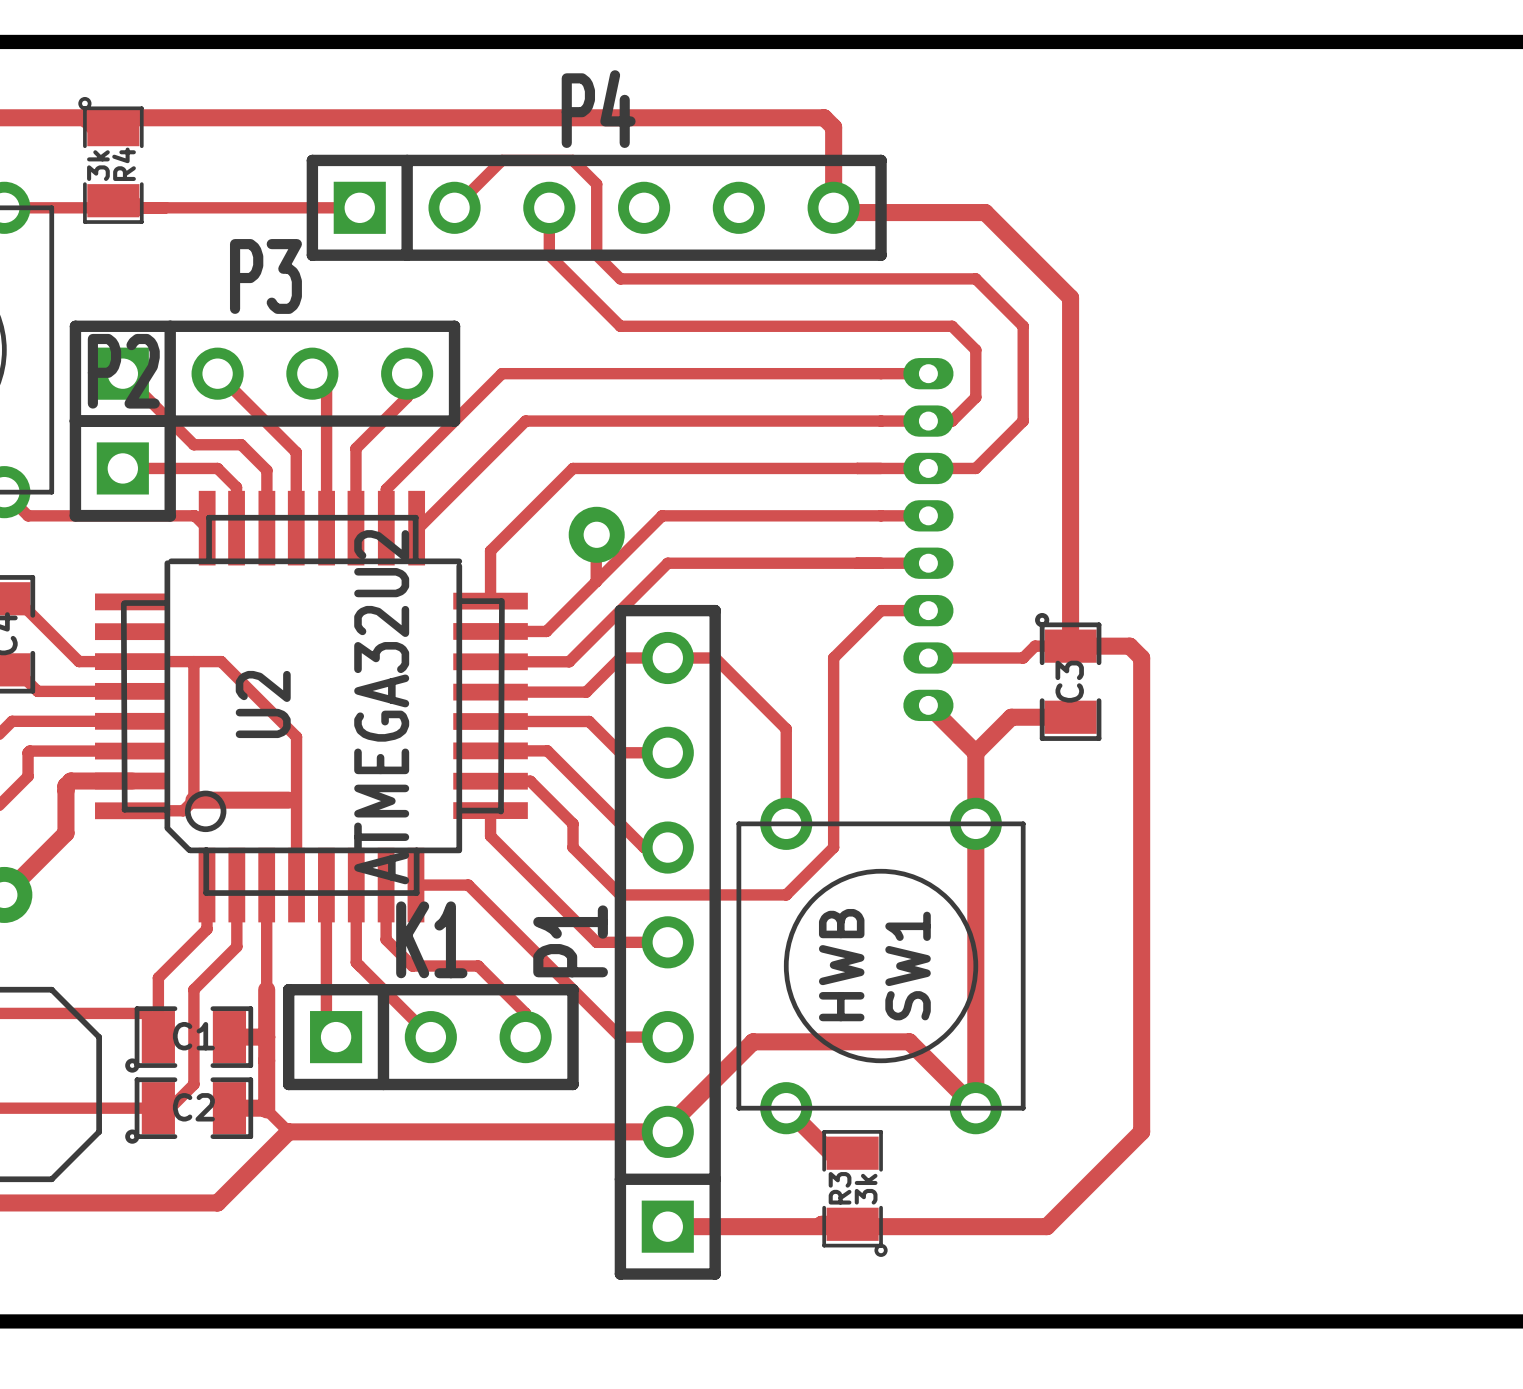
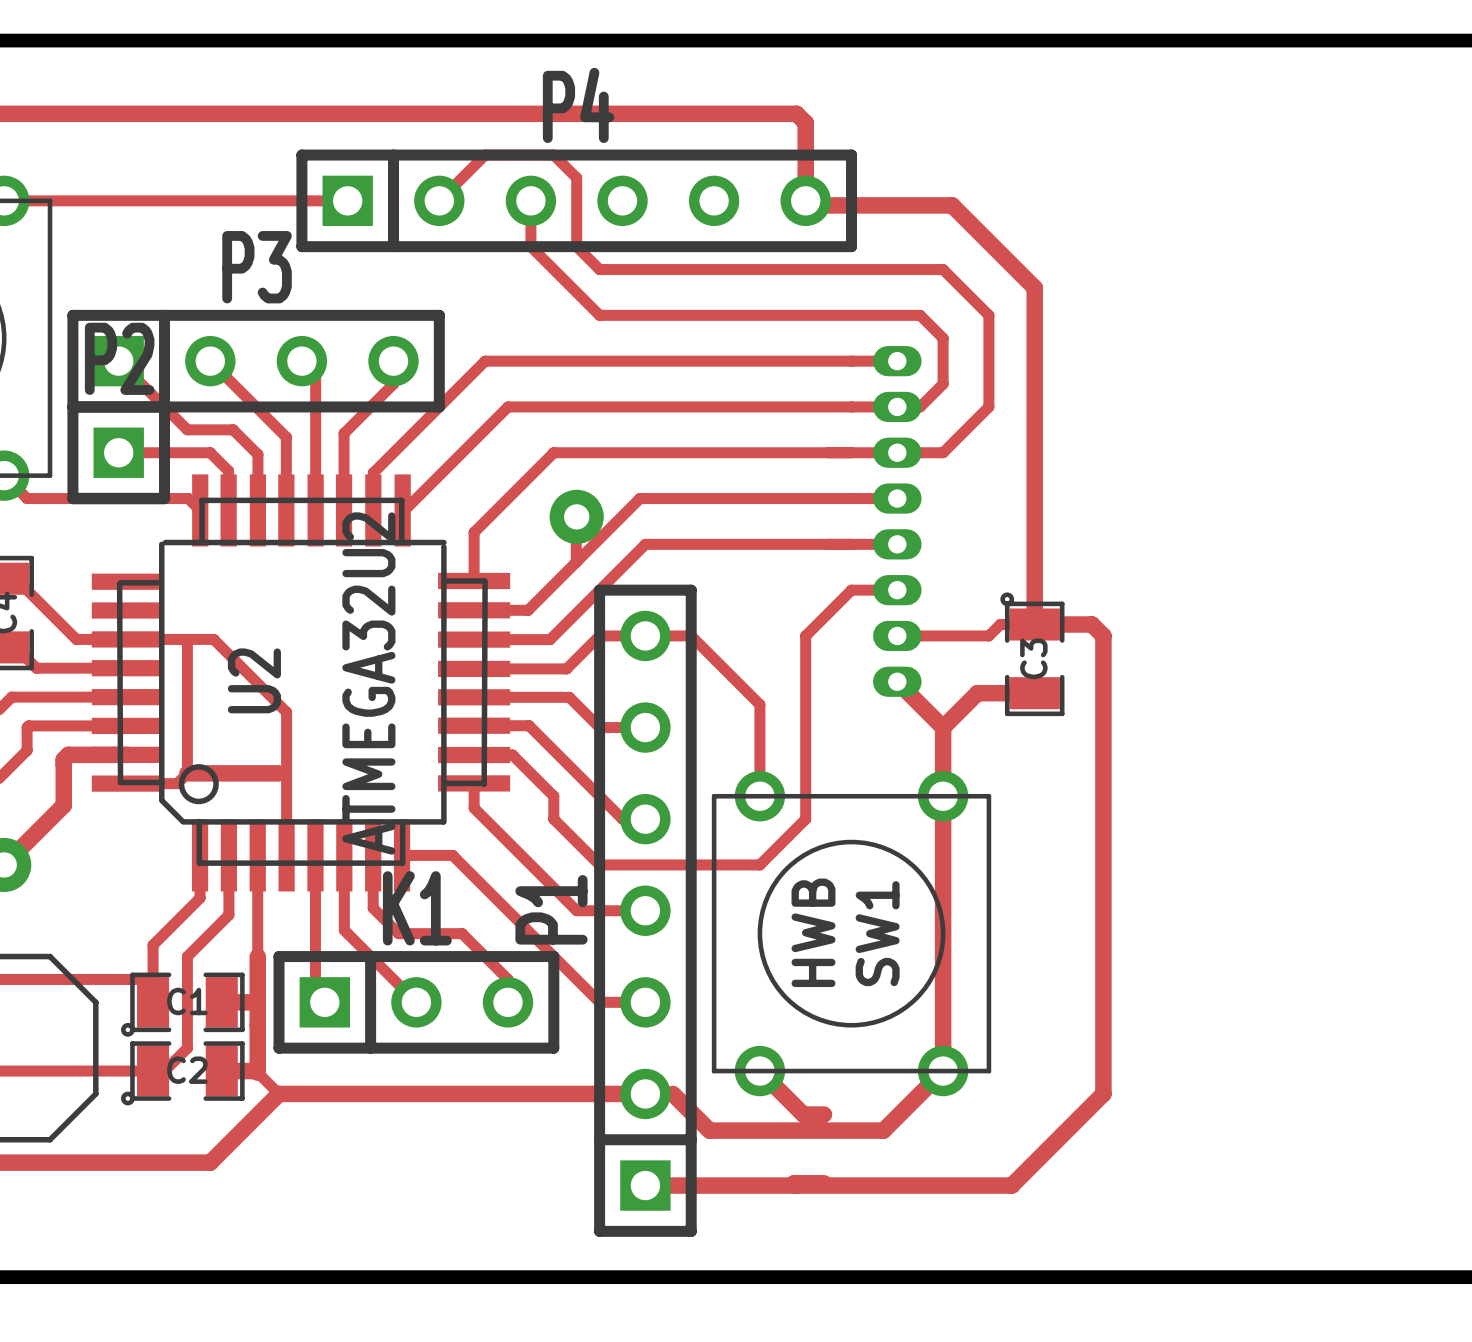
R4: 3k (110, 160) -> none
track: (975, 1108) (909, 1041) (753, 1041) (667, 1127) (667, 1131) -> (943, 1071) (883, 1130) (709, 1130) (672, 1093) (645, 1093)
R3: 3k (854, 1193) -> none

